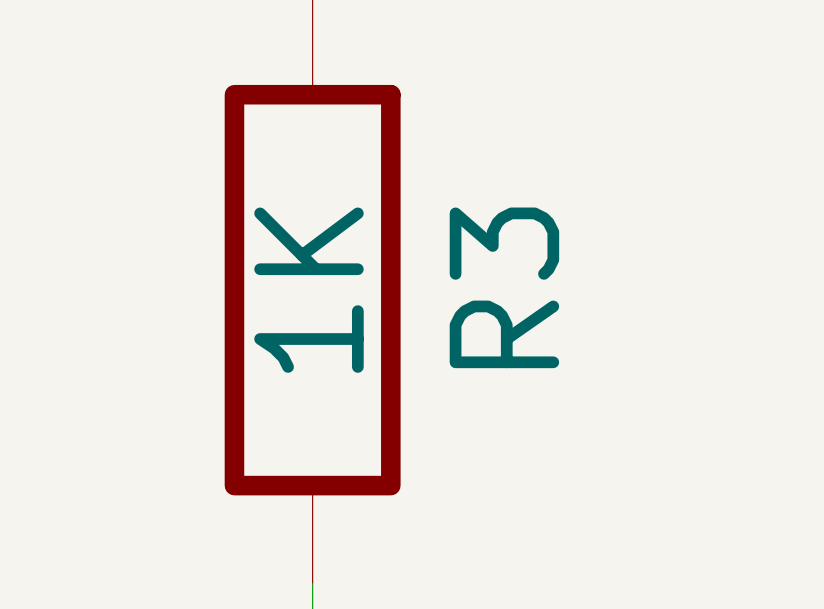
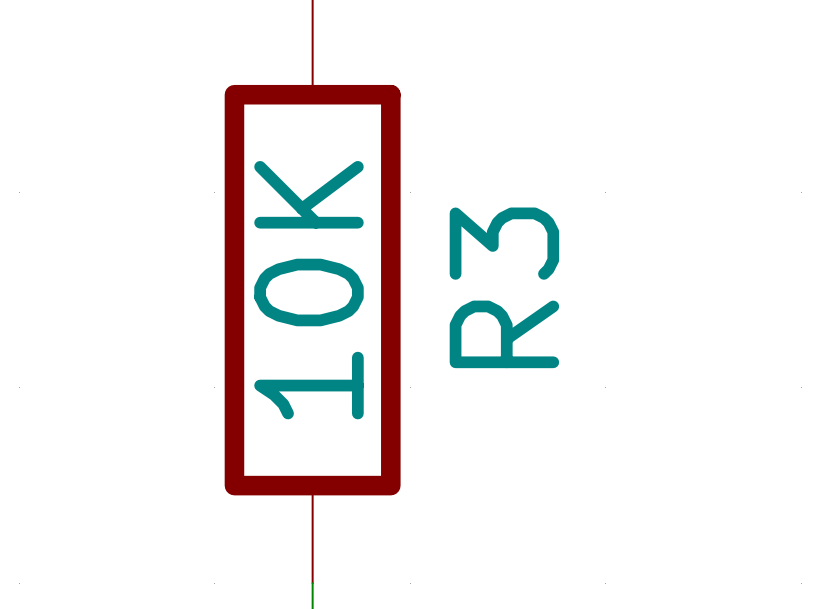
R3 value: 1K (308, 290) -> 10K (308, 290)

